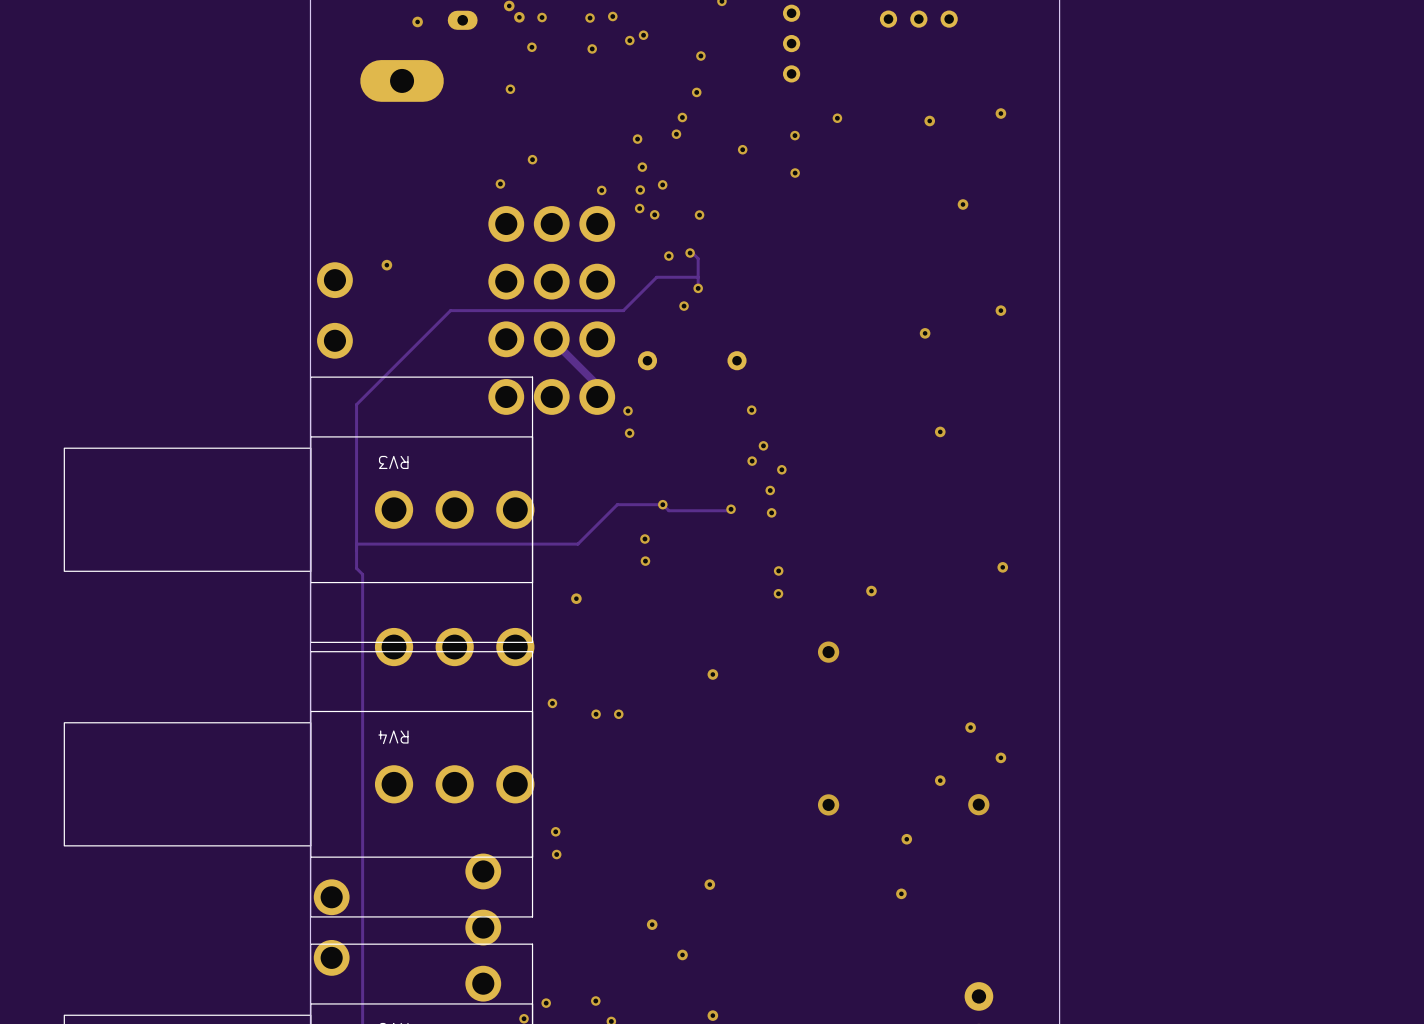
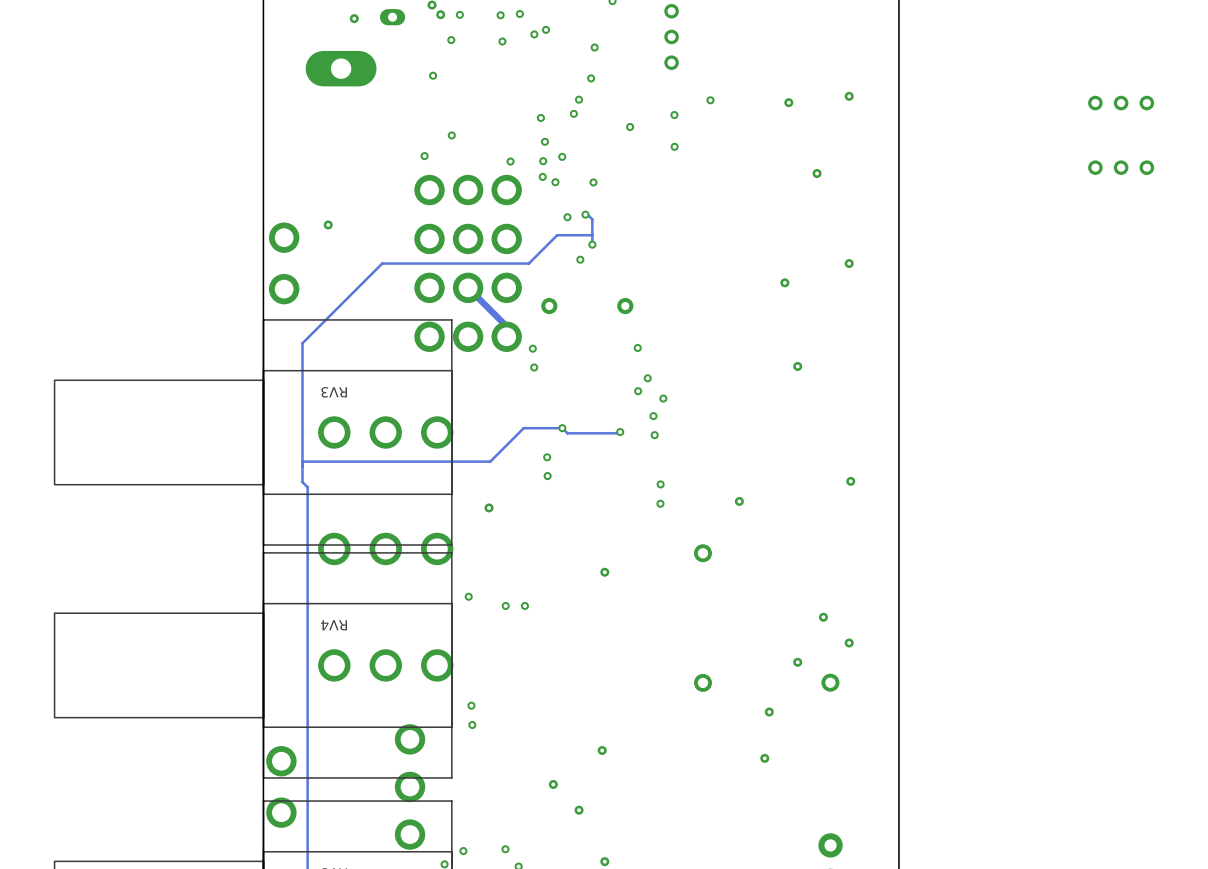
part: (918, 19) -> none
part: none -> (1121, 103)
part: none -> (1121, 167)

